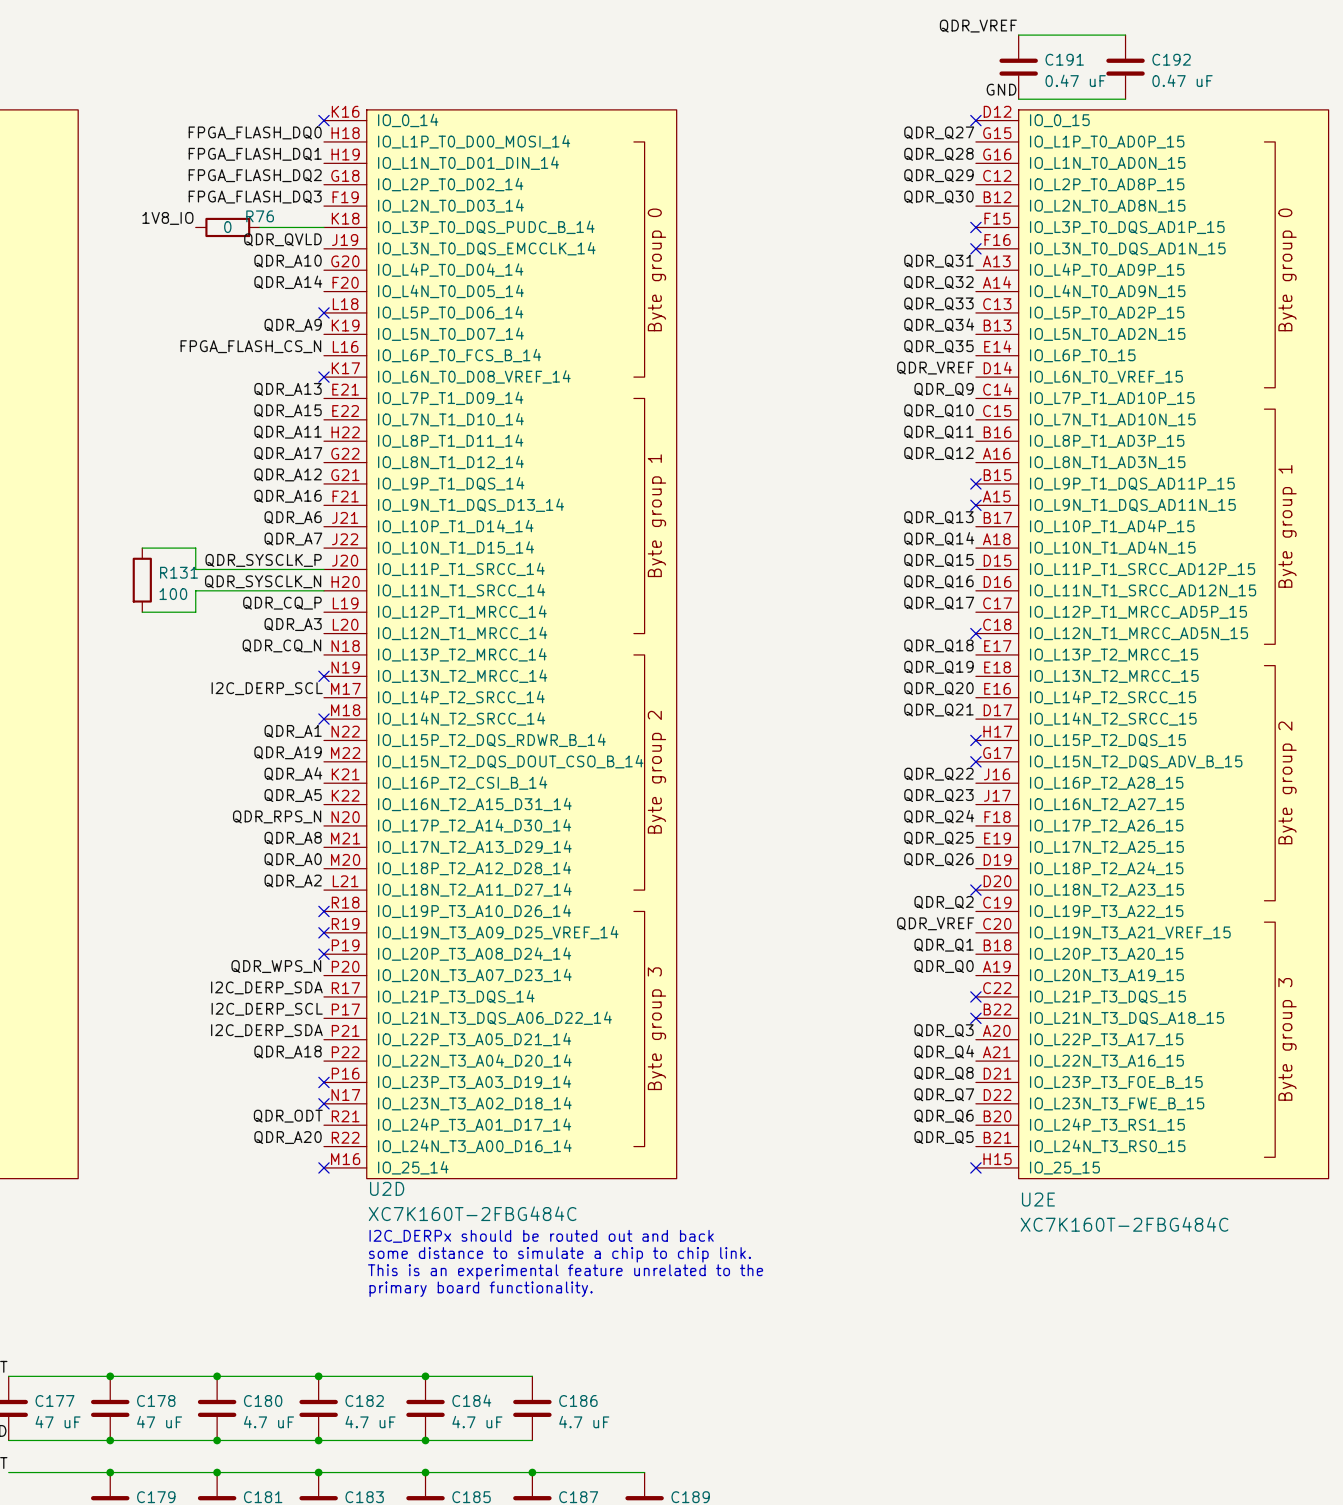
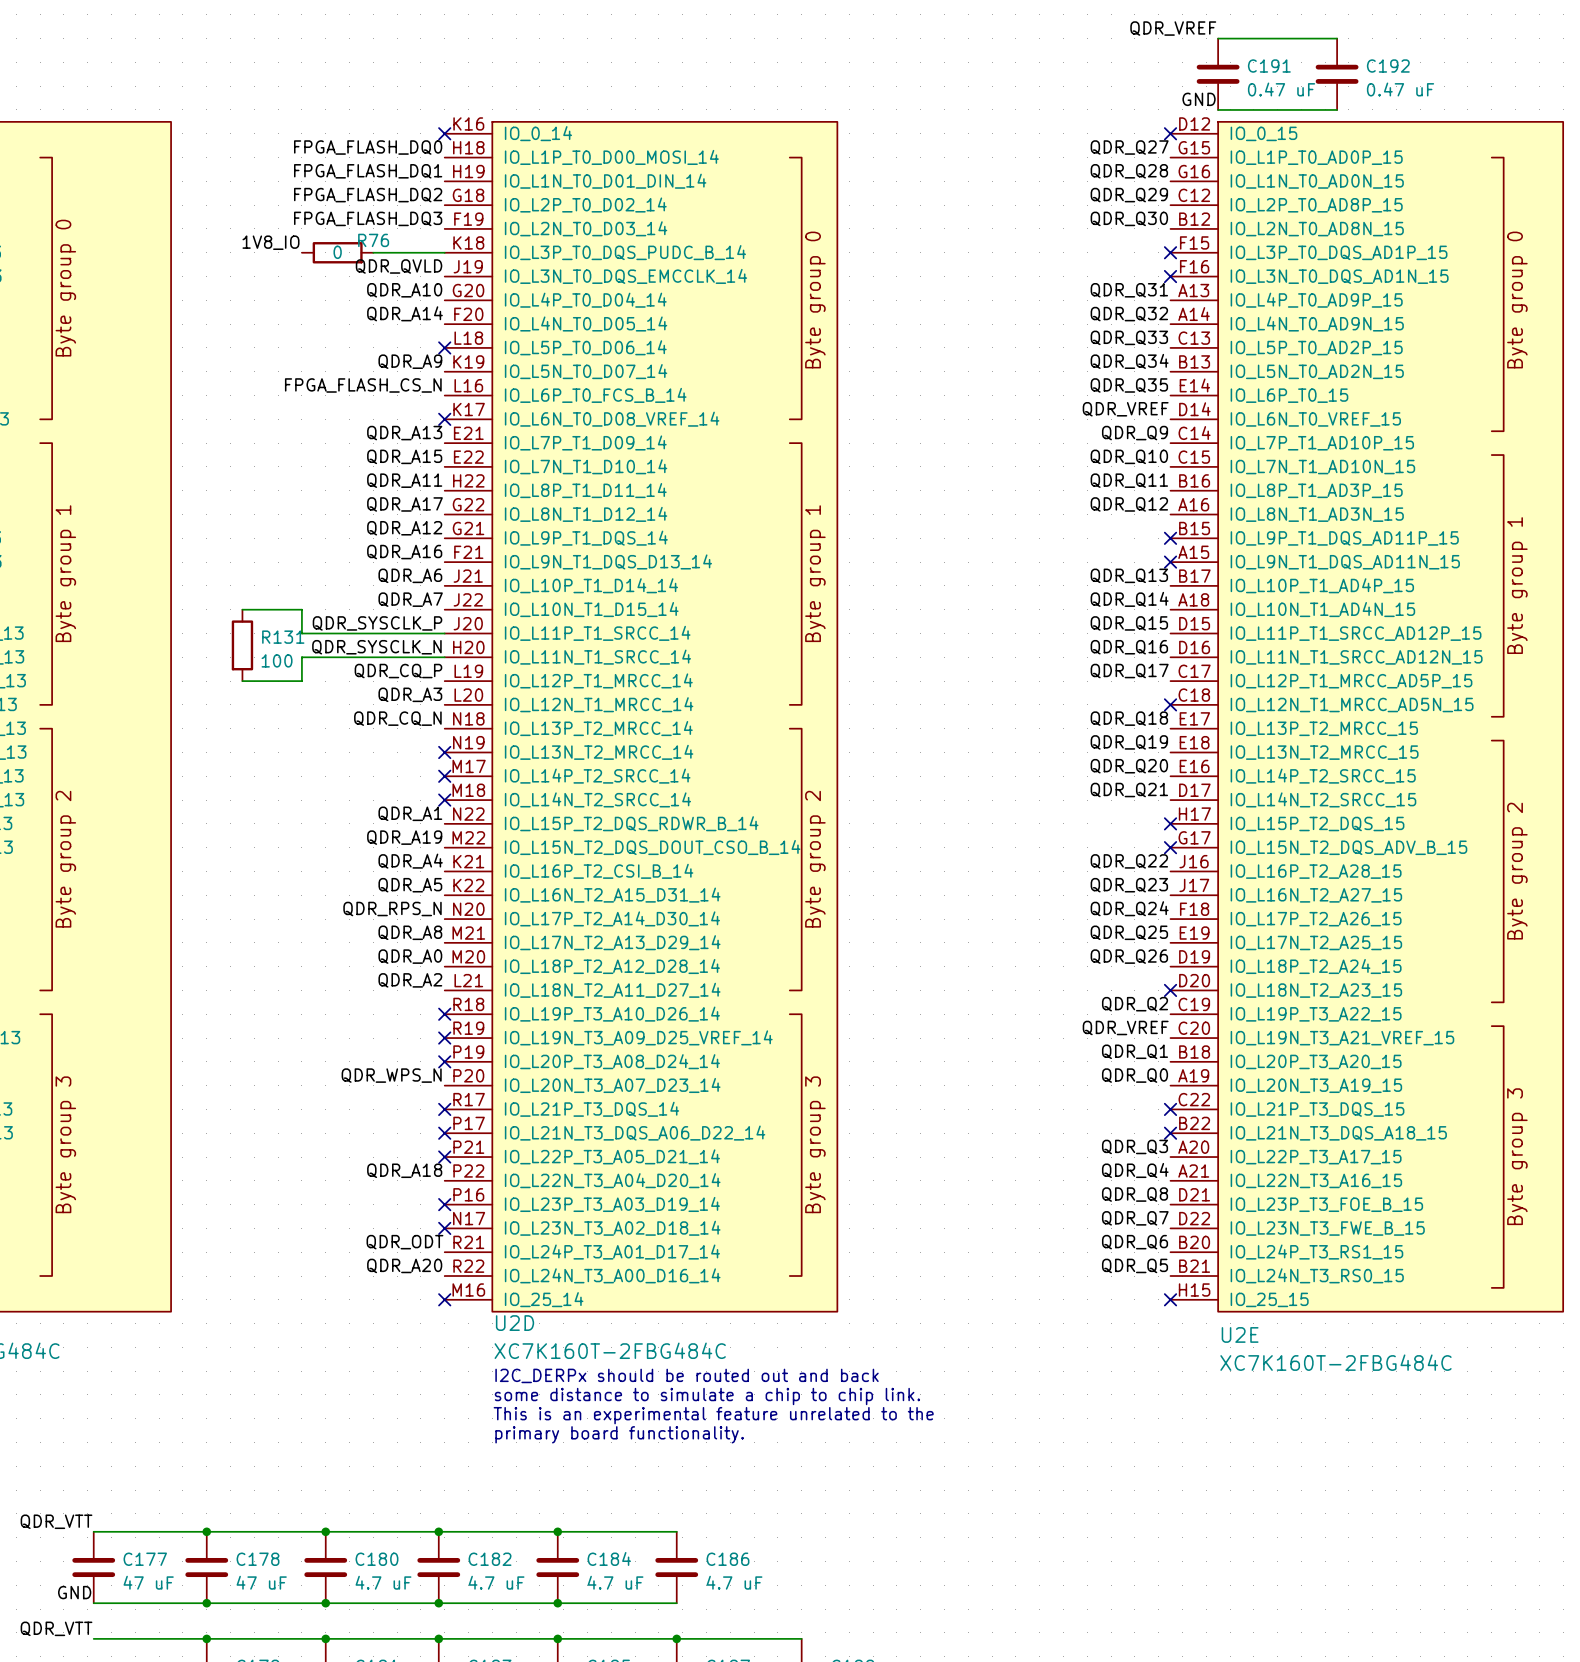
label: I2C_DERP_SCL (267, 688) -> none
no-connect mark: none -> (444, 776)
label: I2C_DERP_SDA (266, 987) -> none
no-connect mark: none -> (444, 1109)
label: I2C_DERP_SCL (267, 1009) -> none
no-connect mark: none -> (444, 1133)
label: I2C_DERP_SDA (266, 1030) -> none
no-connect mark: none -> (444, 1157)

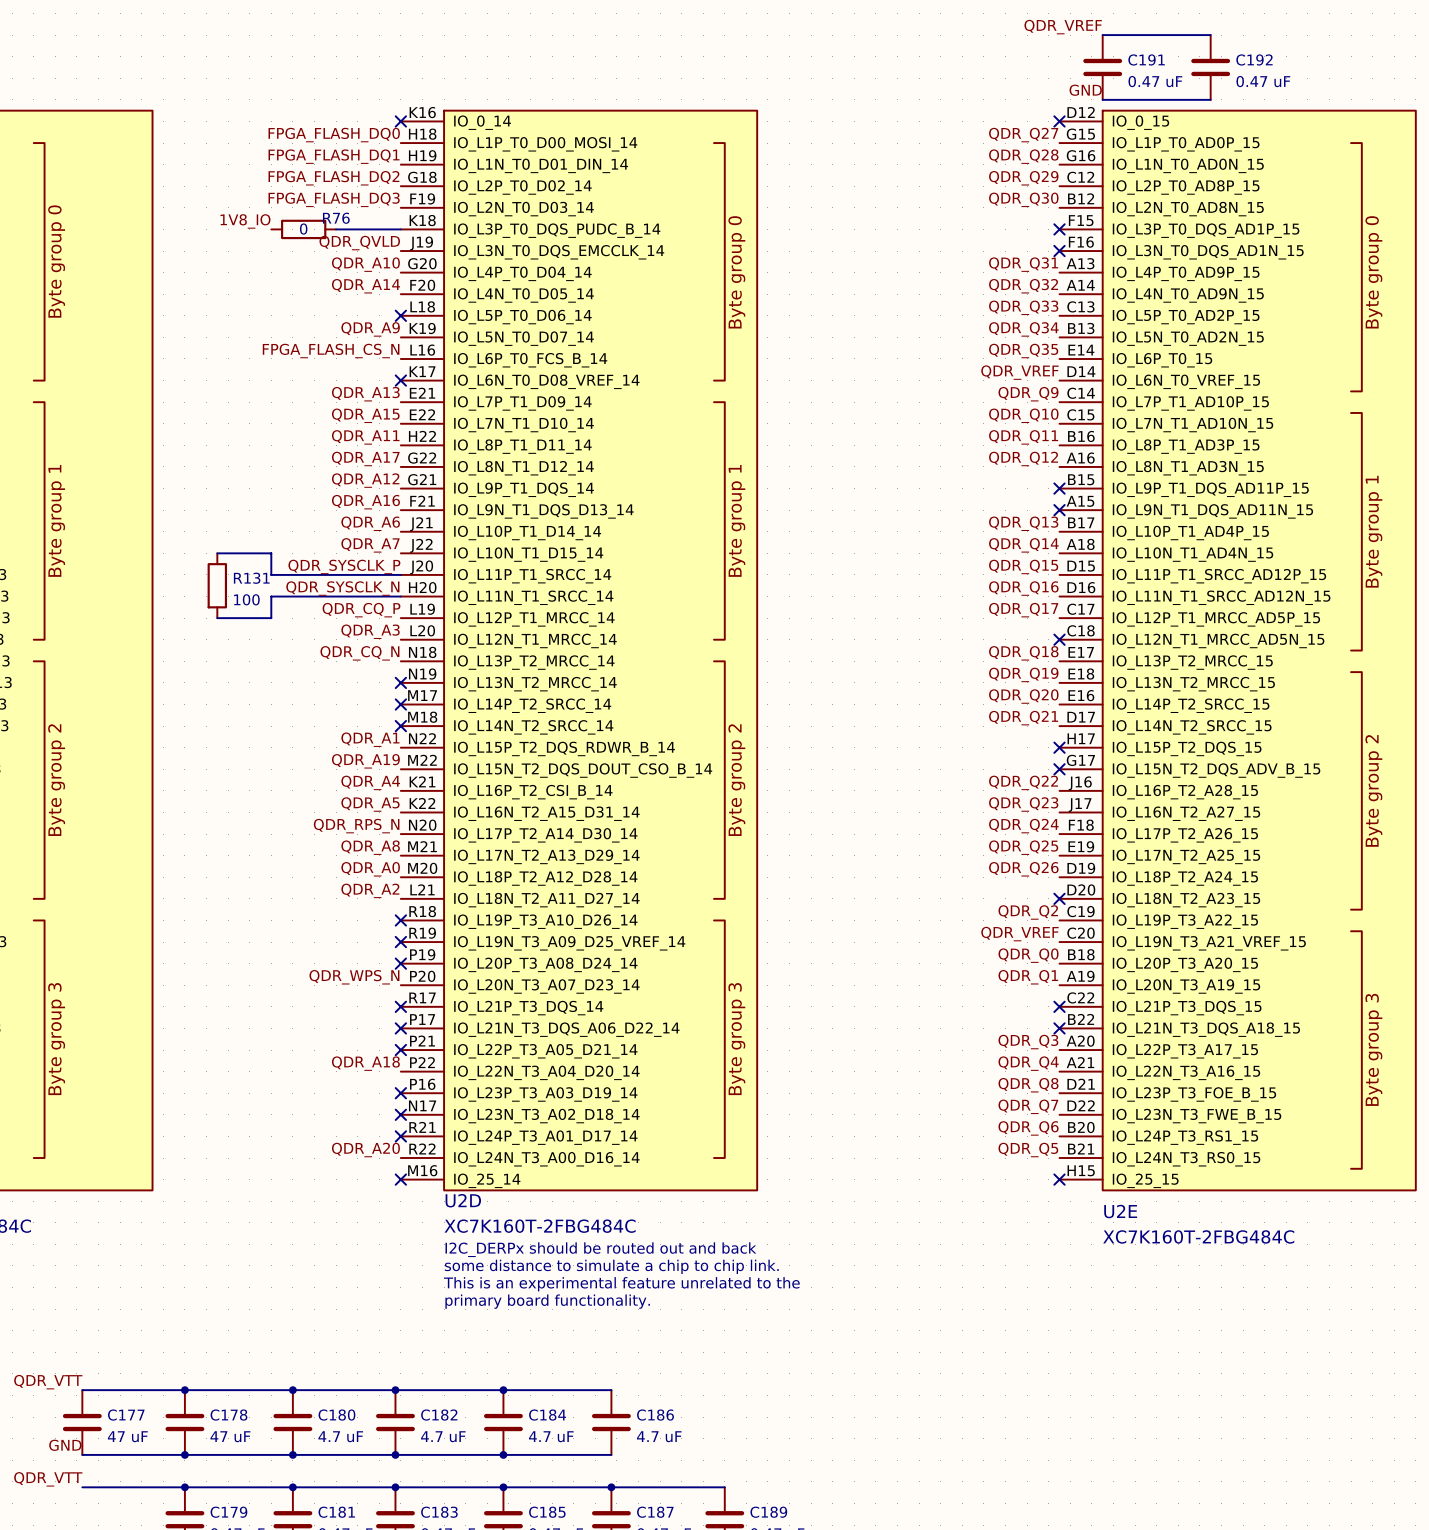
label: QDR_Q1 (1135, 1051) -> QDR_Q0 (1028, 955)
label: QDR_Q0 (1135, 1075) -> QDR_Q1 (1028, 977)
label: QDR_ODT (404, 1242) -> none
no-connect mark: none -> (400, 1136)

